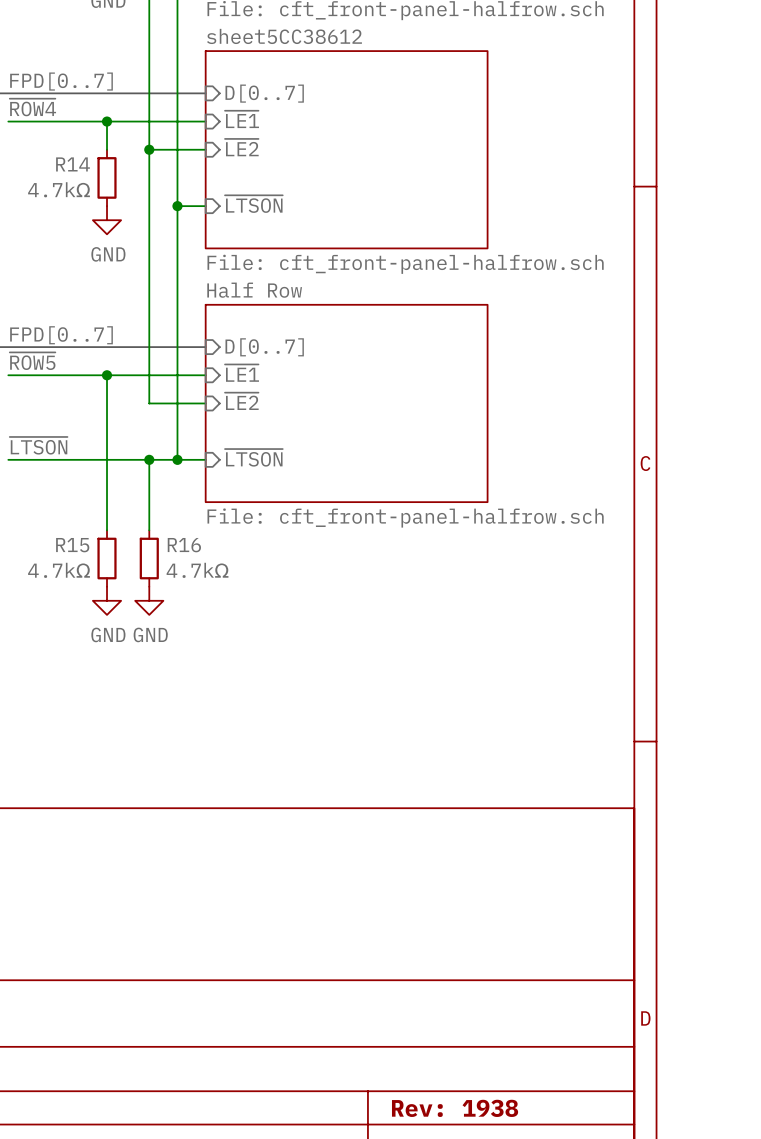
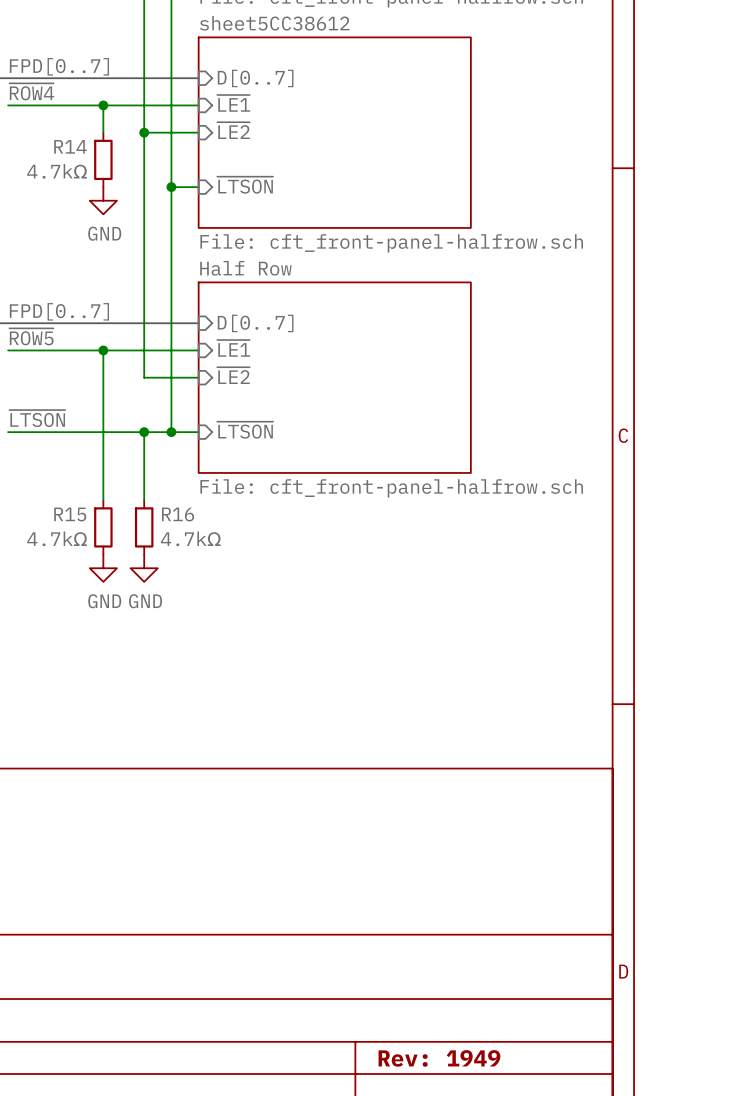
title block: Rev: 1938 (455, 1108) -> Rev: 1949 (439, 1058)

